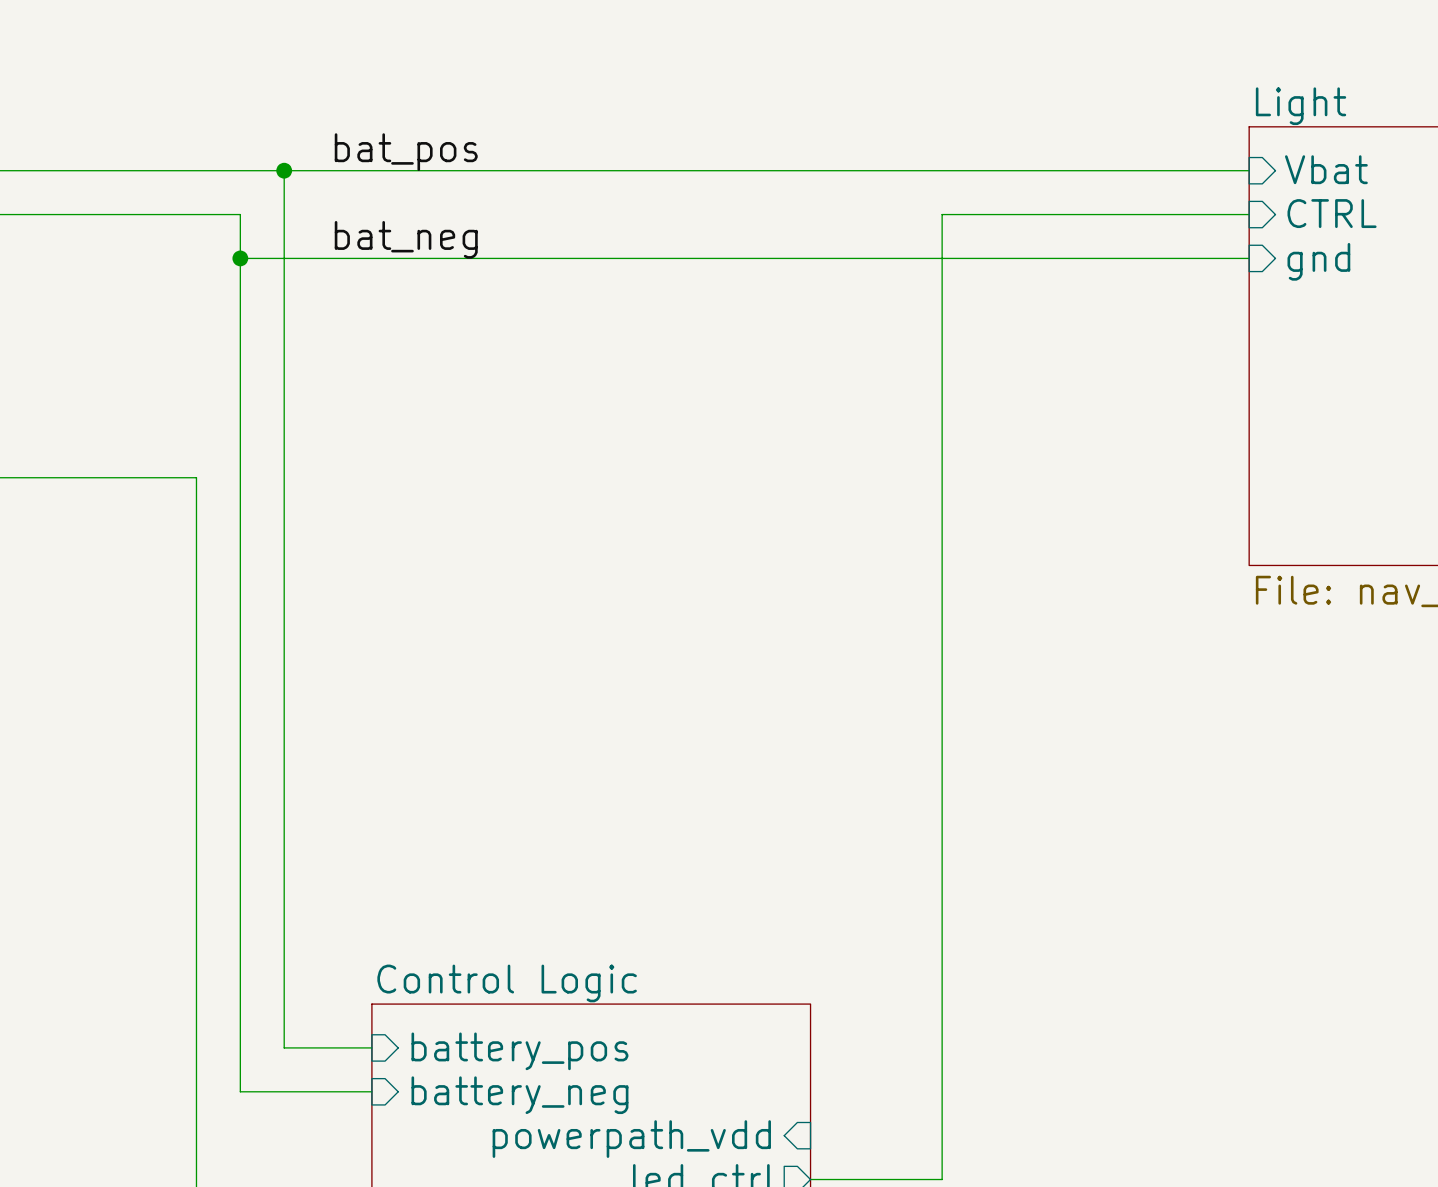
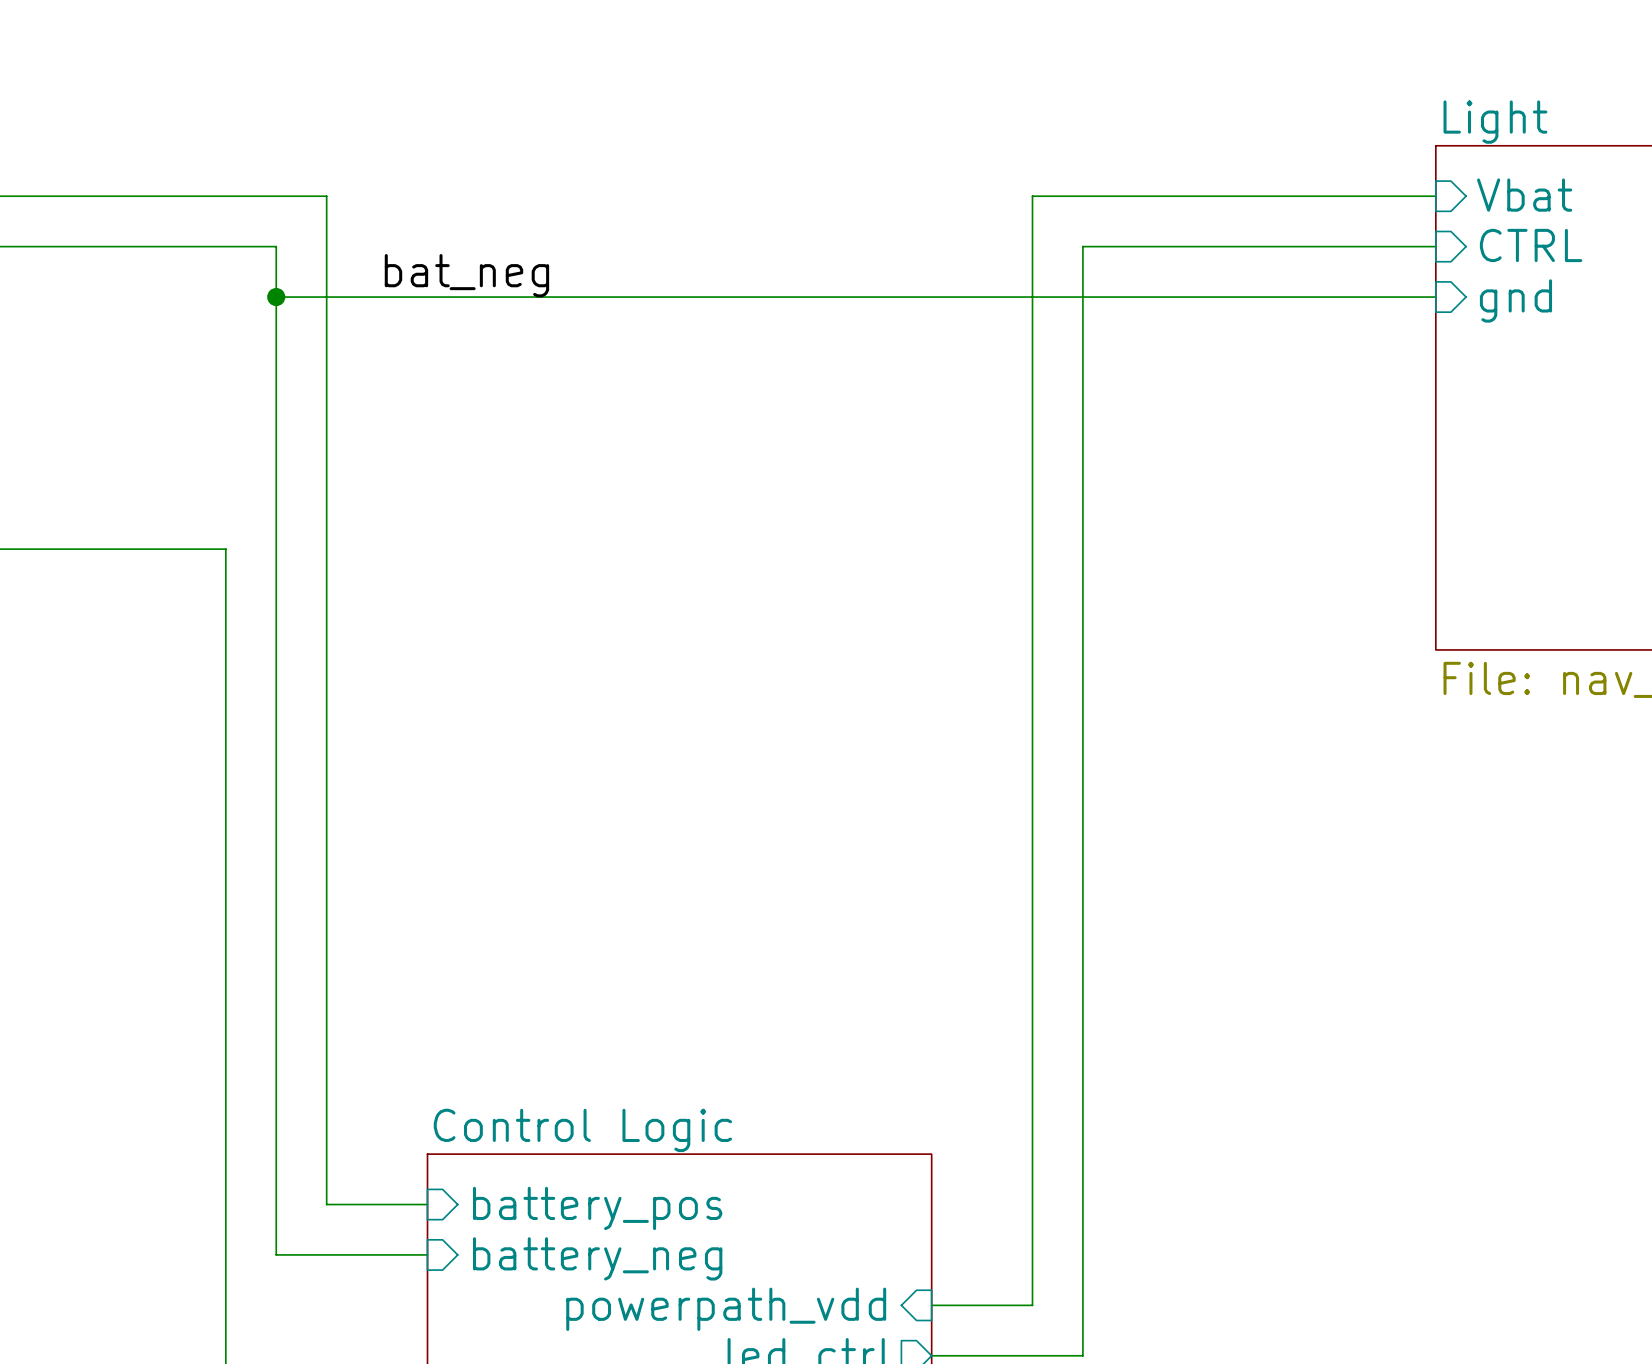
label: bat_pos (406, 152) -> none
wire: (284, 170) (898, 170) -> (931, 1305) (1032, 1305) (1032, 196)
junction: (284, 170) -> none

